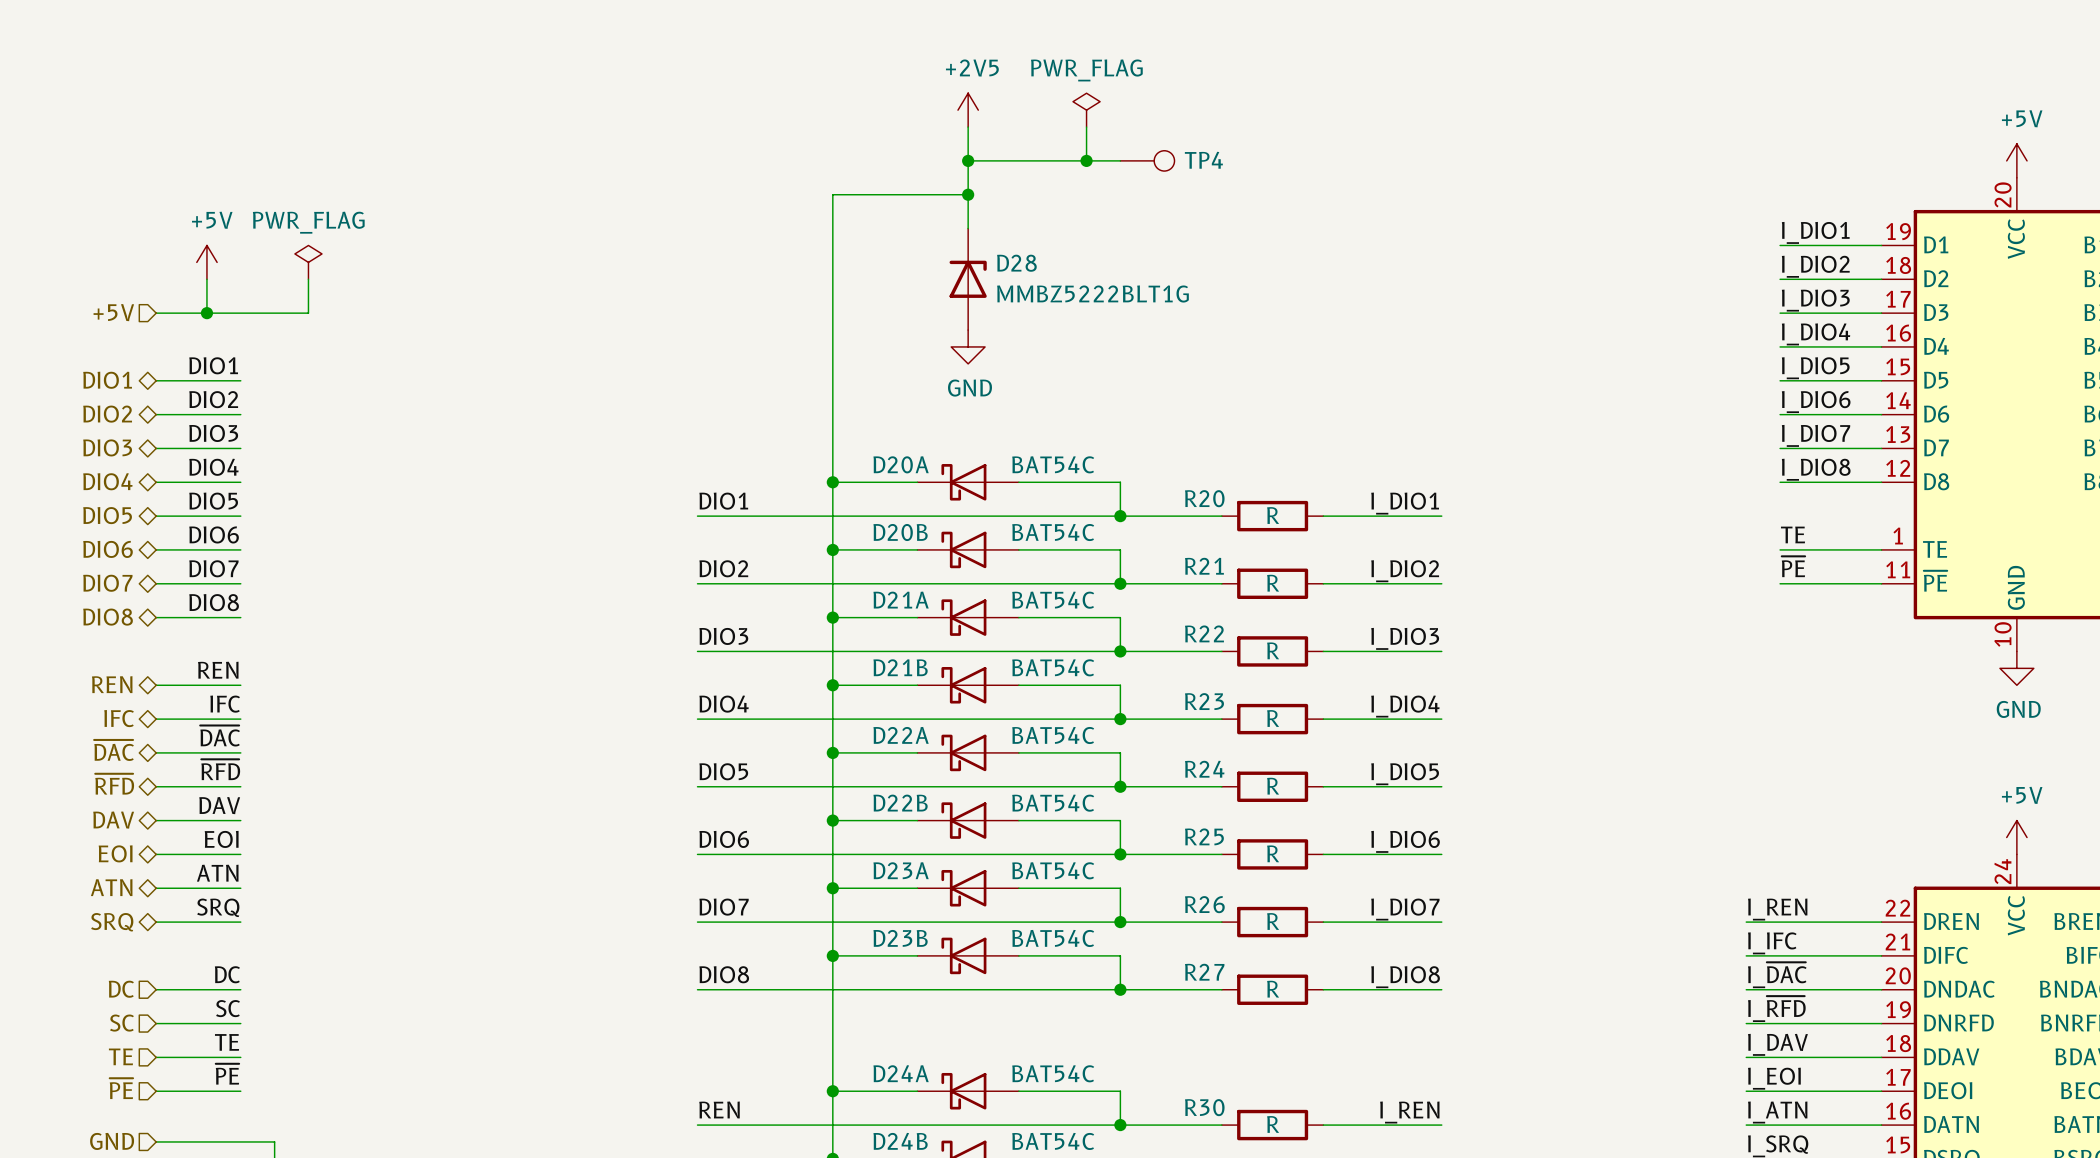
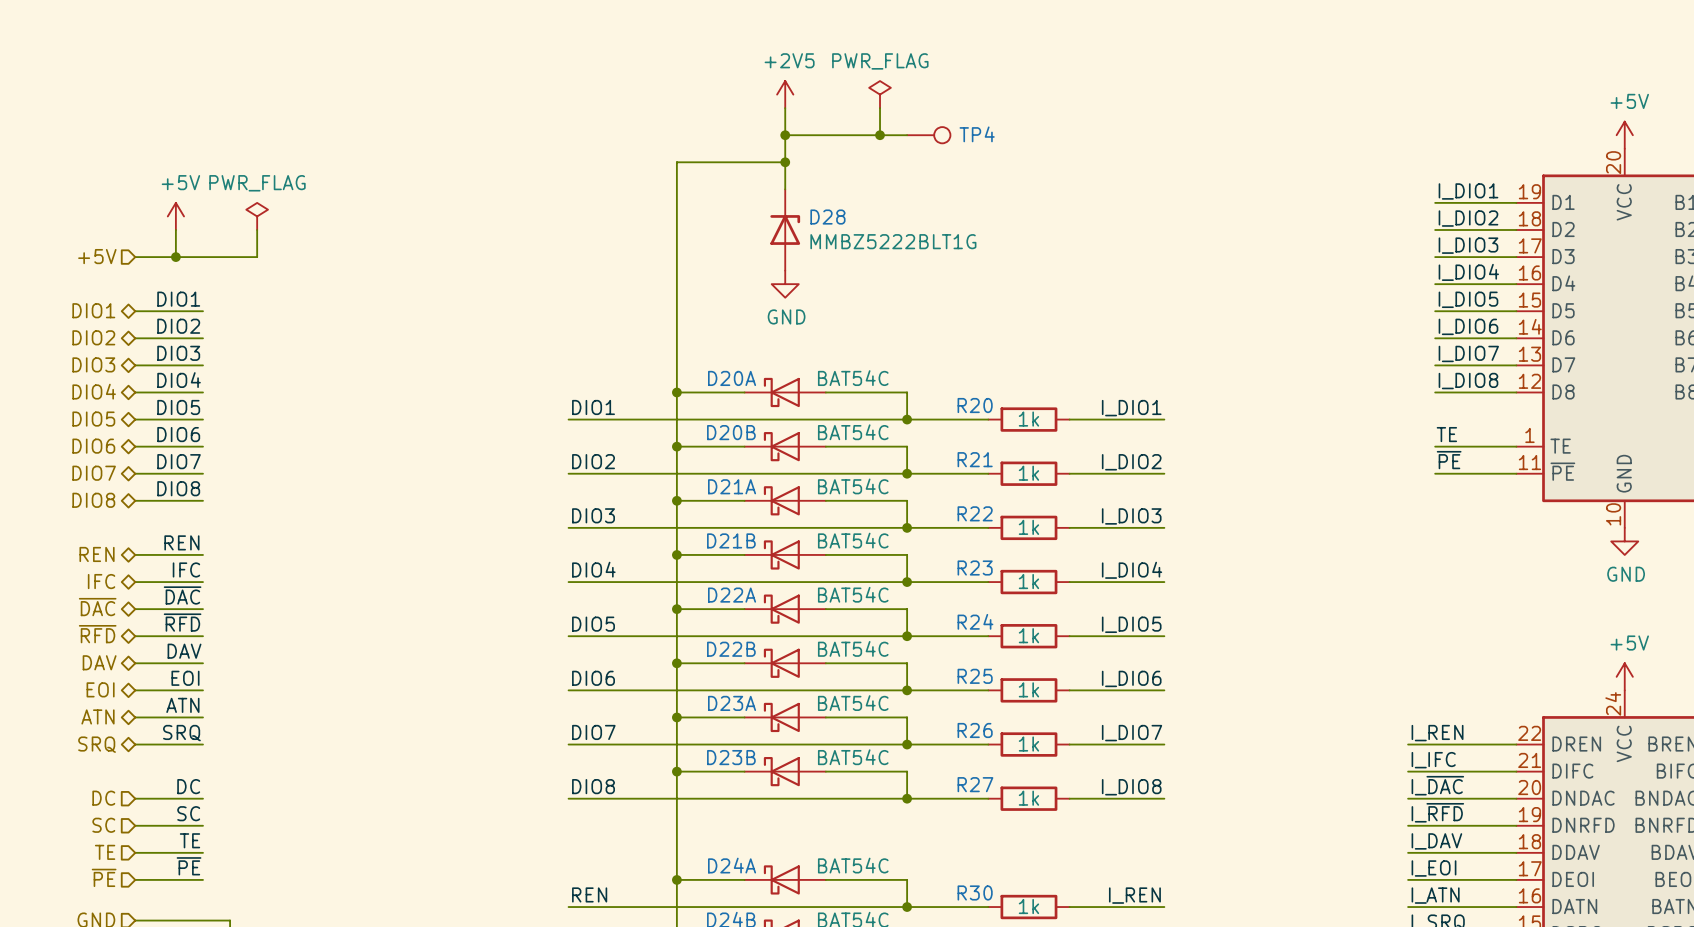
R20 value: R (1273, 515) -> 1k (1028, 419)
R21 value: R (1273, 583) -> 1k (1028, 473)
R22 value: R (1273, 650) -> 1k (1028, 527)
R23 value: R (1273, 718) -> 1k (1028, 581)
R24 value: R (1273, 786) -> 1k (1028, 635)
R25 value: R (1273, 853) -> 1k (1028, 689)
R26 value: R (1273, 921) -> 1k (1028, 744)
R27 value: R (1273, 989) -> 1k (1028, 798)
R30 value: R (1273, 1124) -> 1k (1028, 906)

